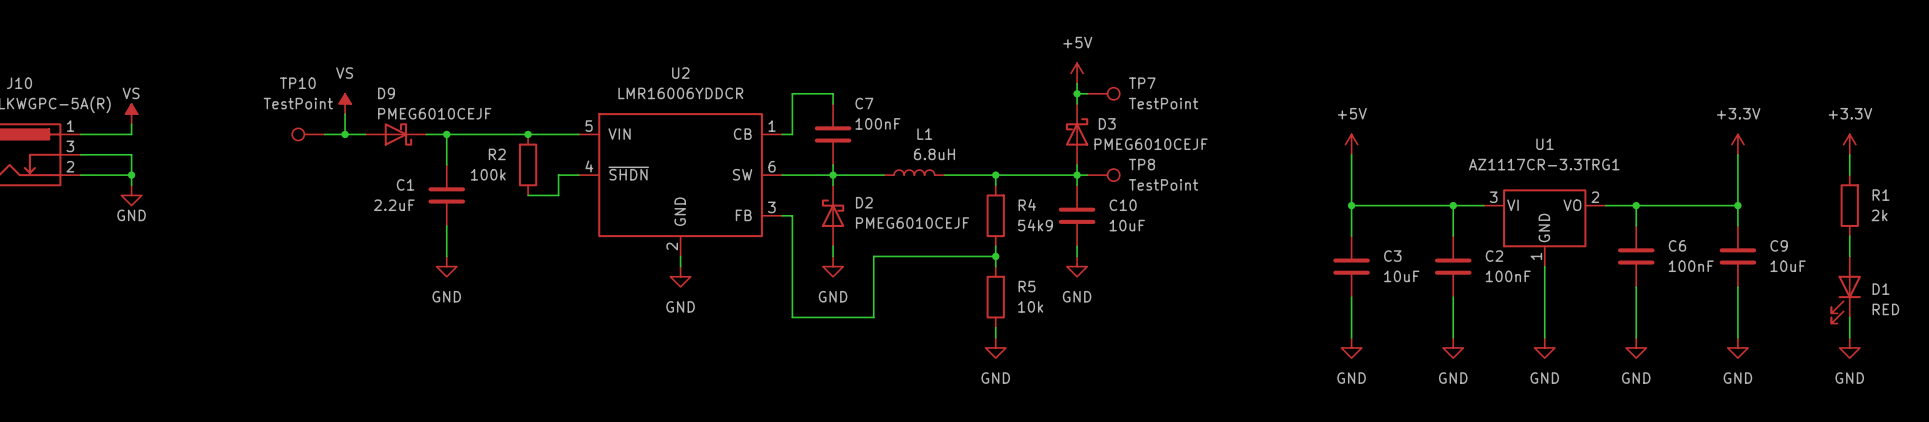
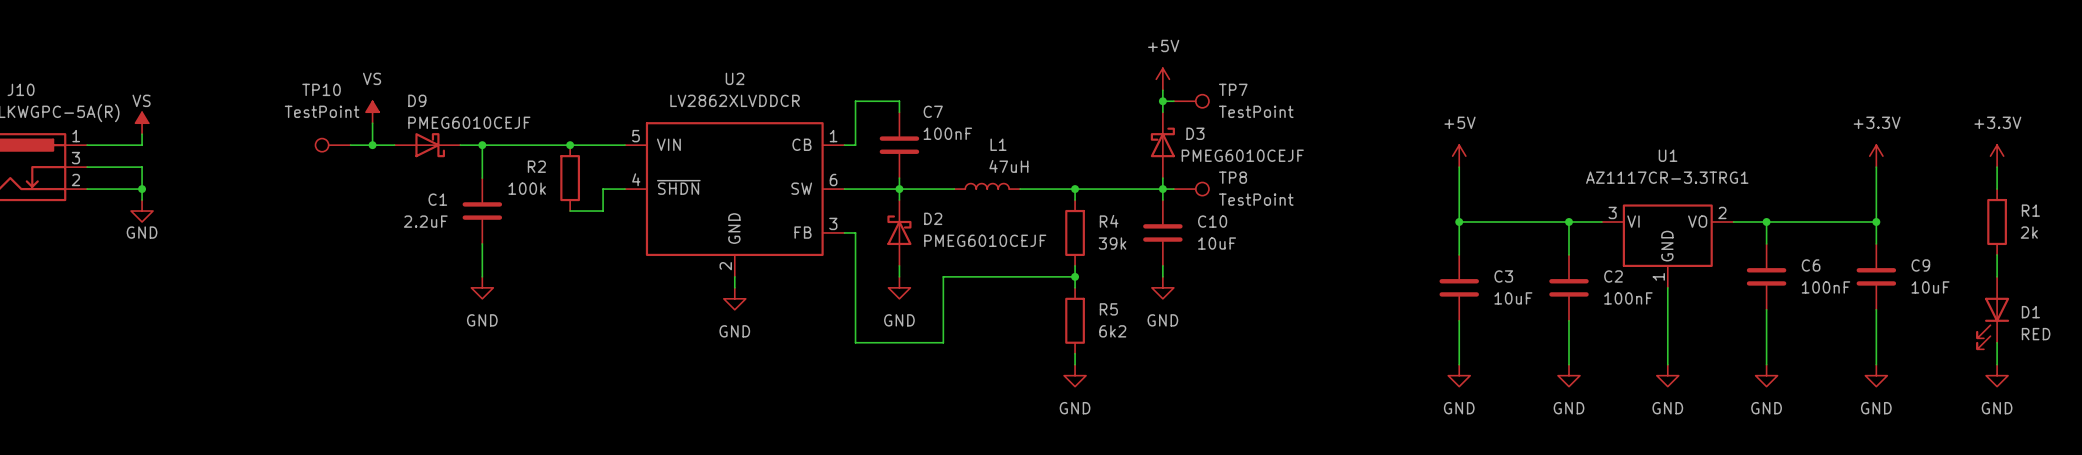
U2 value: LMR16006YDDCR (680, 93) -> LV2862XLVDDCR (735, 100)
L1 value: 6.8uH (934, 154) -> 47uH (1008, 166)
R4 value: 54k9 (1035, 225) -> 39k (1112, 243)
R5 value: 10k (1030, 306) -> 6k2 (1112, 331)

